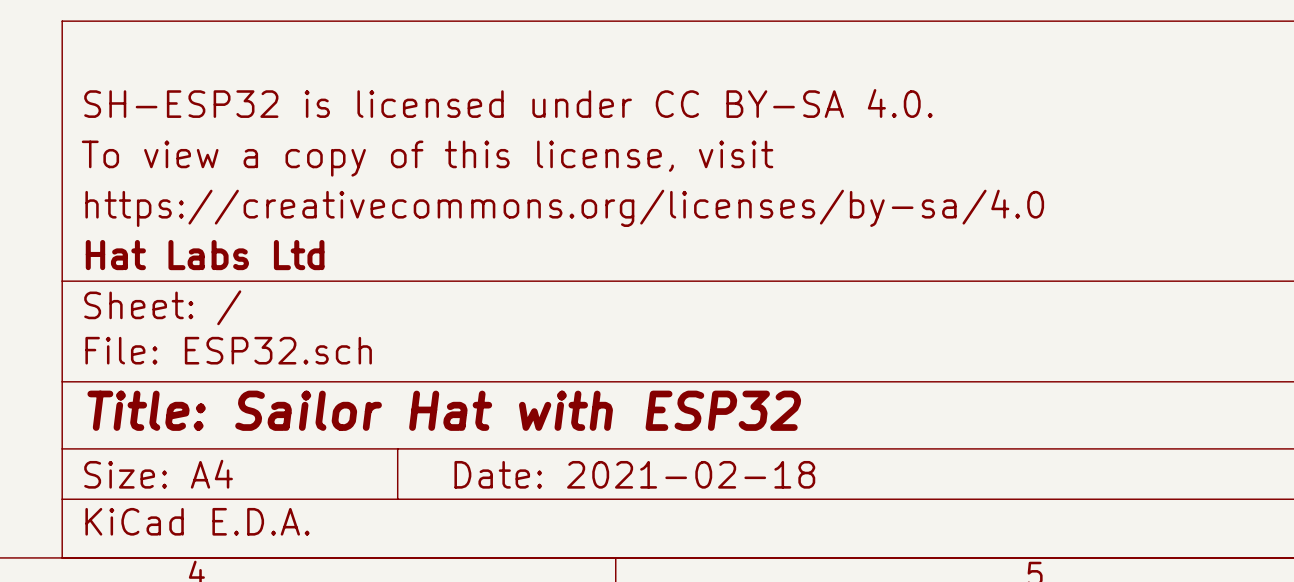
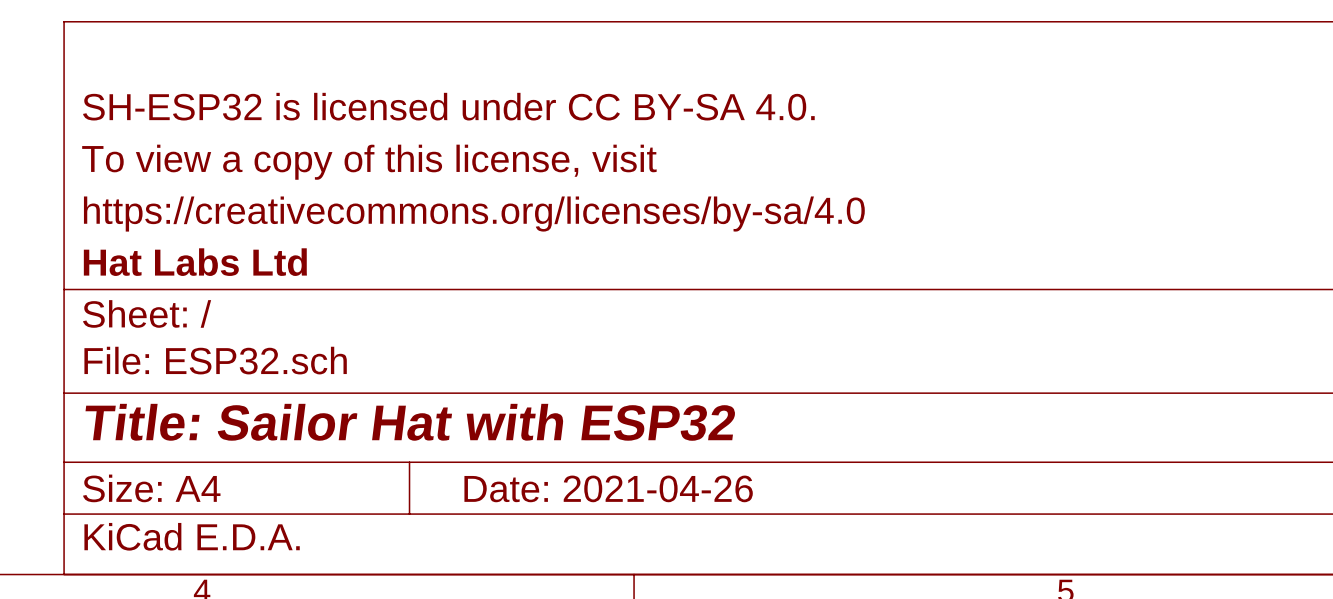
title block: Date: 2021-02-18 (634, 474) -> Date: 2021-04-26 (608, 488)

